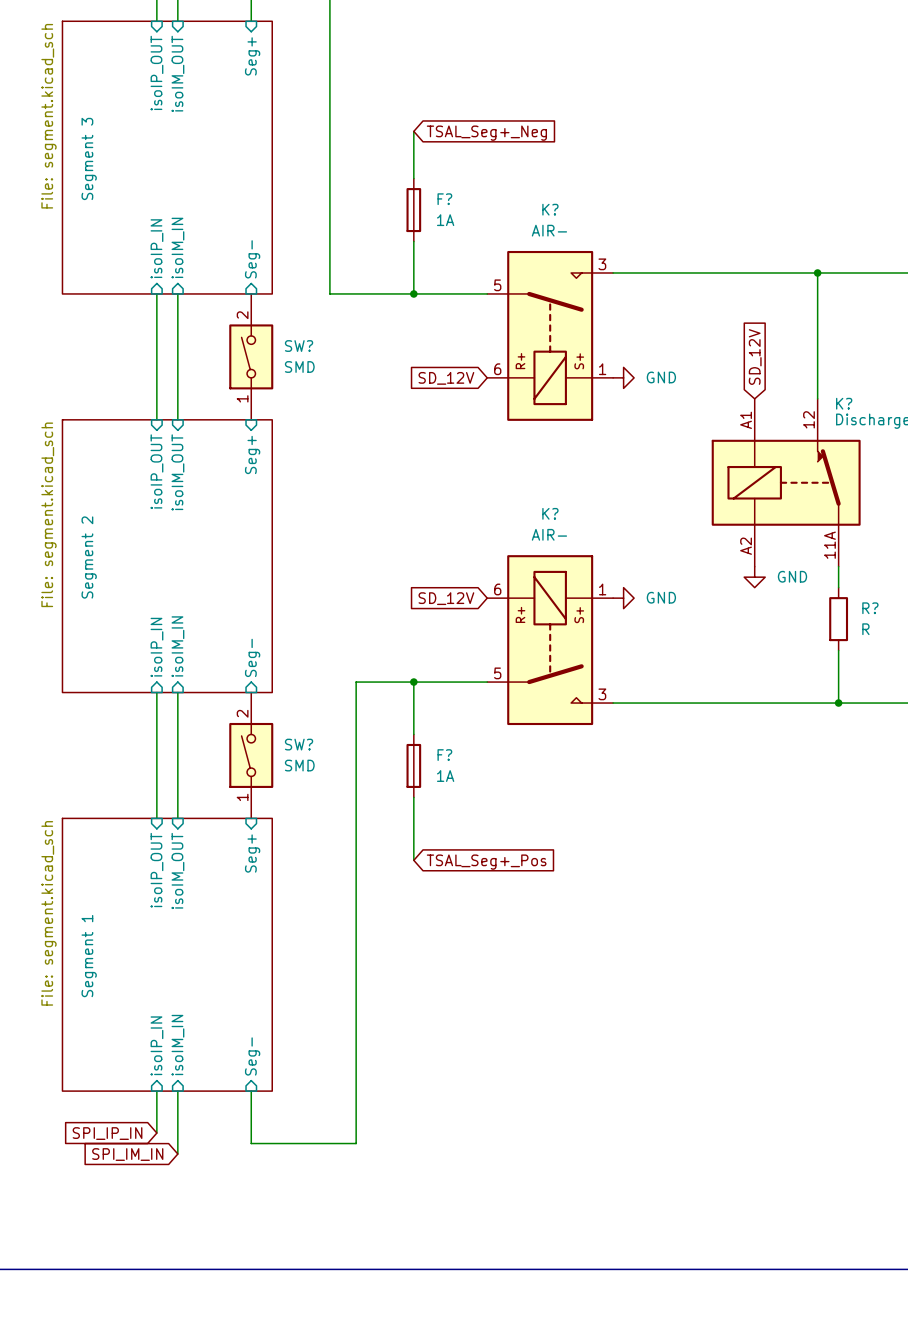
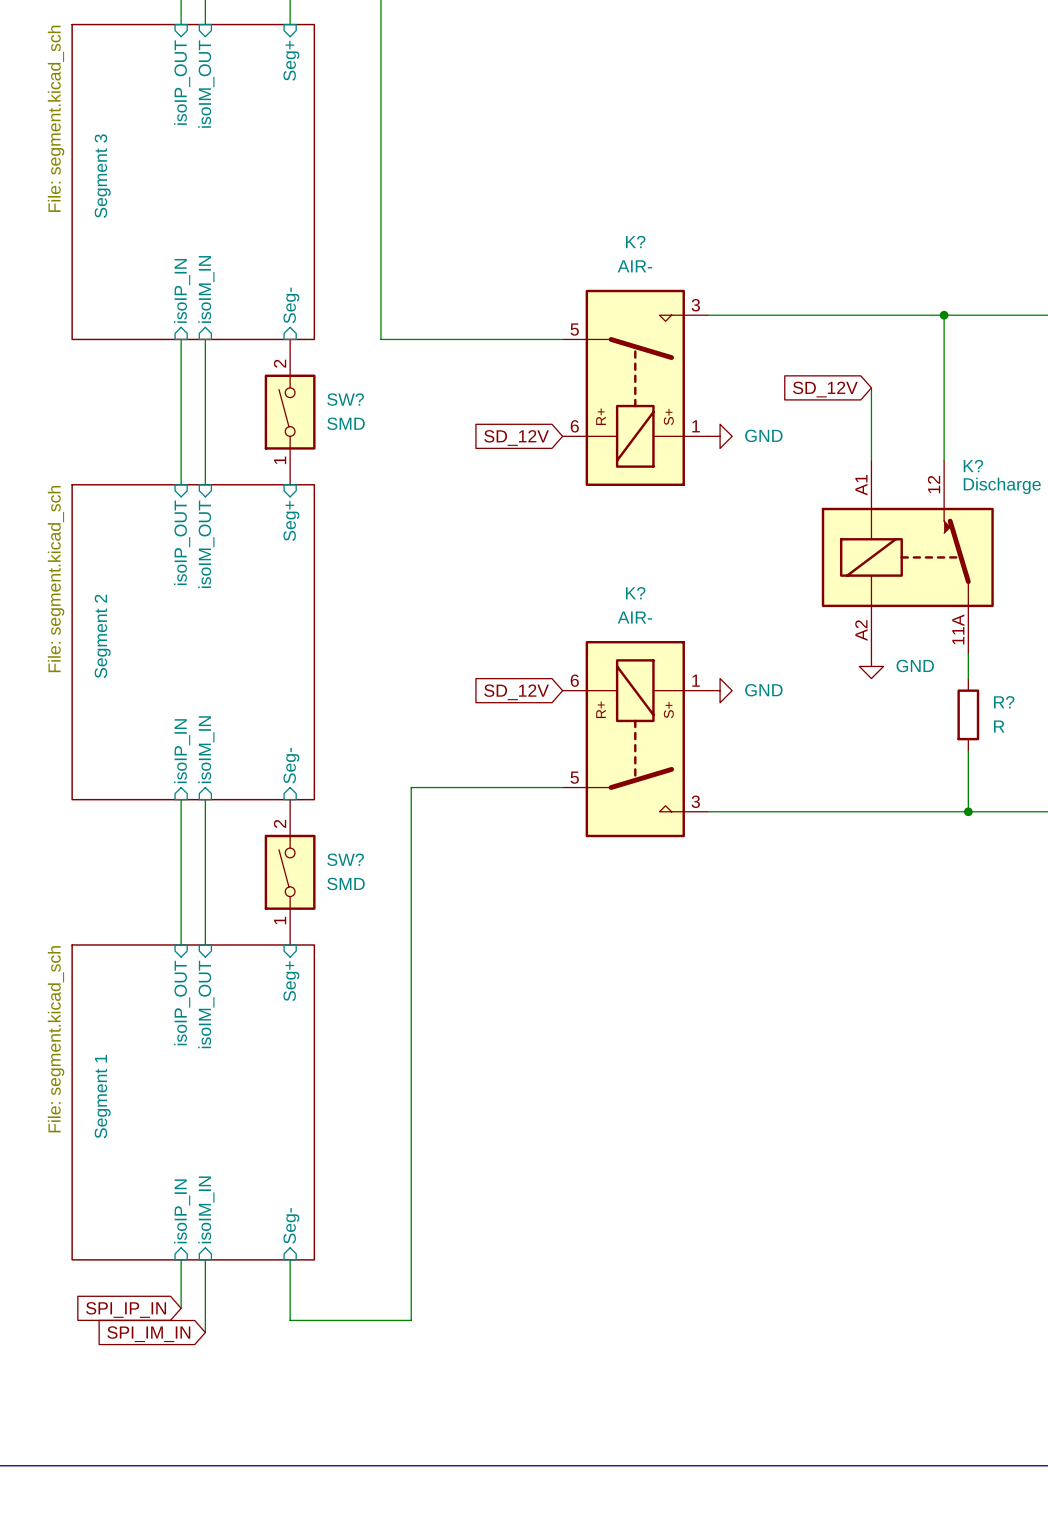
wire: (413, 131) (413, 178) -> none
global label: TSAL_Seg+_Neg (486, 133) -> none
F?: 1A (413, 210) -> none
wire: (413, 241) (413, 293) -> none
junction: (413, 293) -> none
wire: none -> (871, 387) (871, 460)
global label rotation: 0° (755, 357) -> 90° counterclockwise (825, 389)
wire: (413, 682) (413, 734) -> none
junction: (413, 682) -> none
F?: 1A (413, 765) -> none
wire: (413, 797) (413, 860) -> none
global label: TSAL_Seg+_Pos (486, 862) -> none

